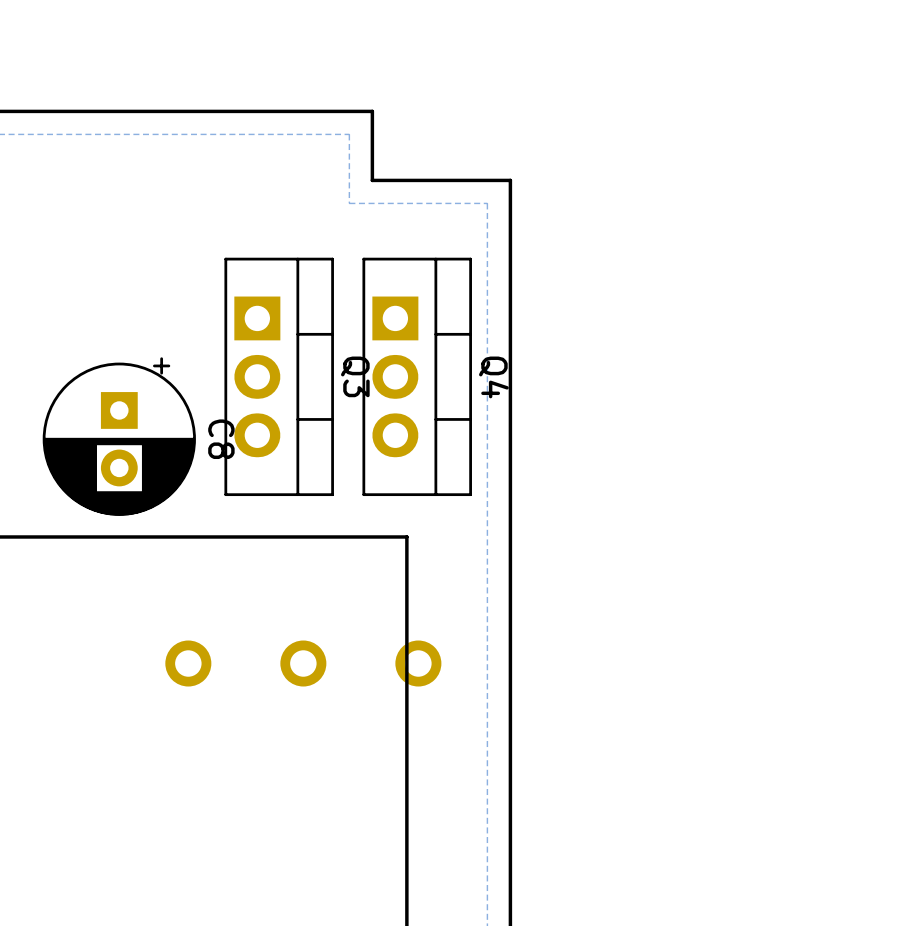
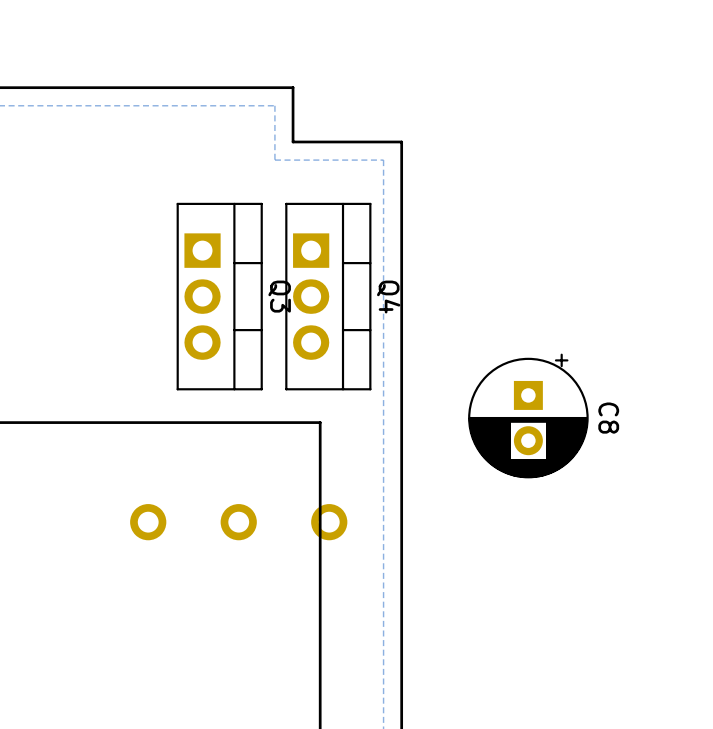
C8 position: (119, 436) -> (528, 415)

